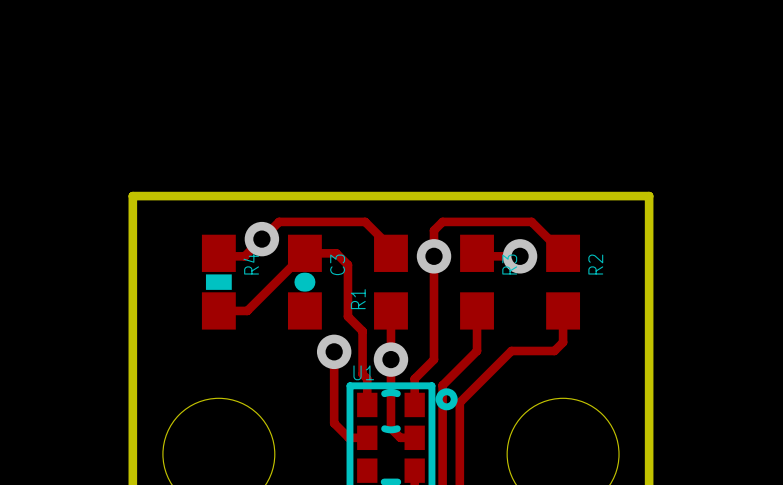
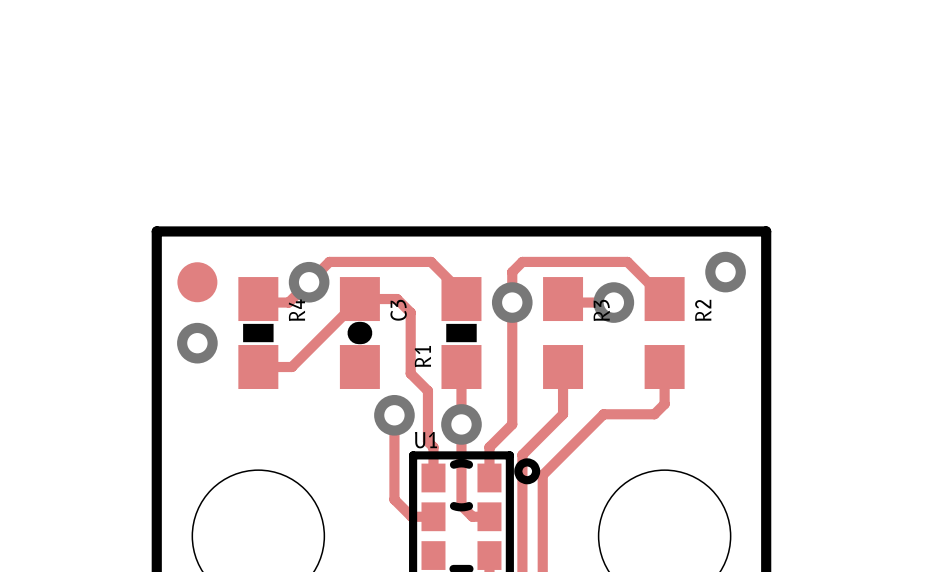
via: none -> (725, 272)
R1 footprint: [374, 234, 408, 330] -> [441, 277, 482, 390]
part: none -> (197, 282)
via: none -> (197, 343)

